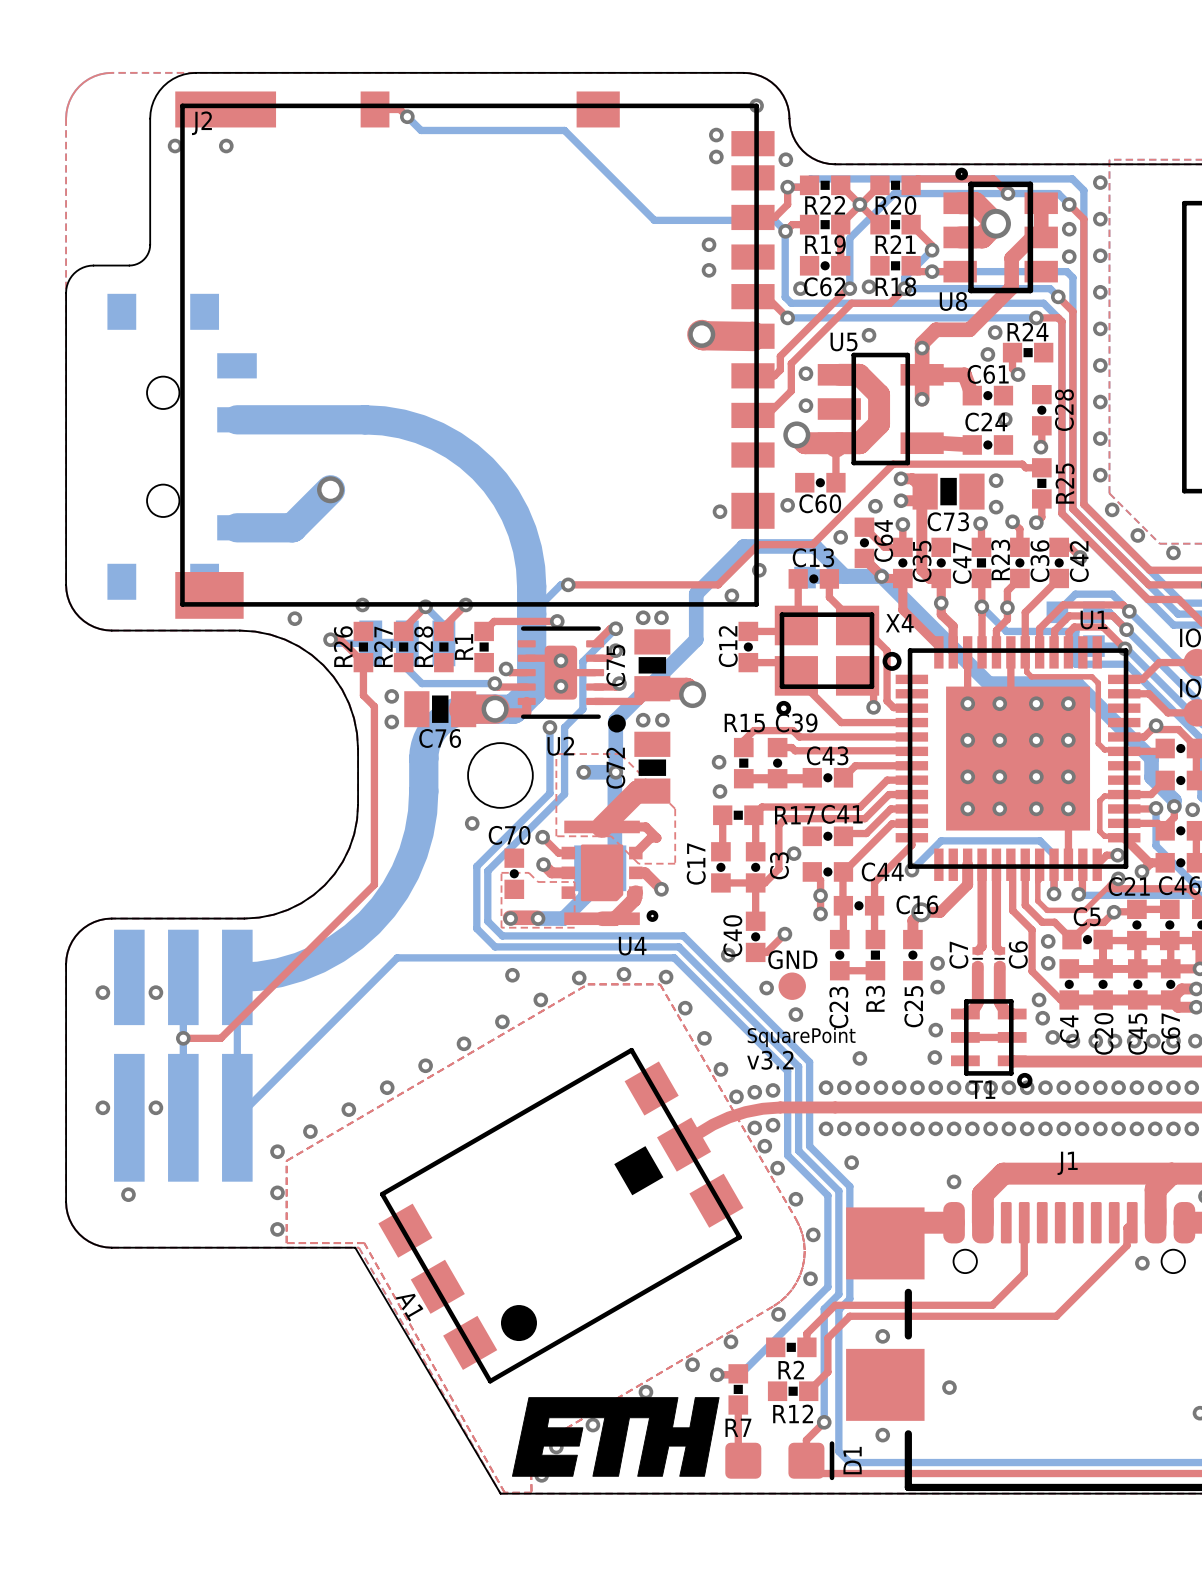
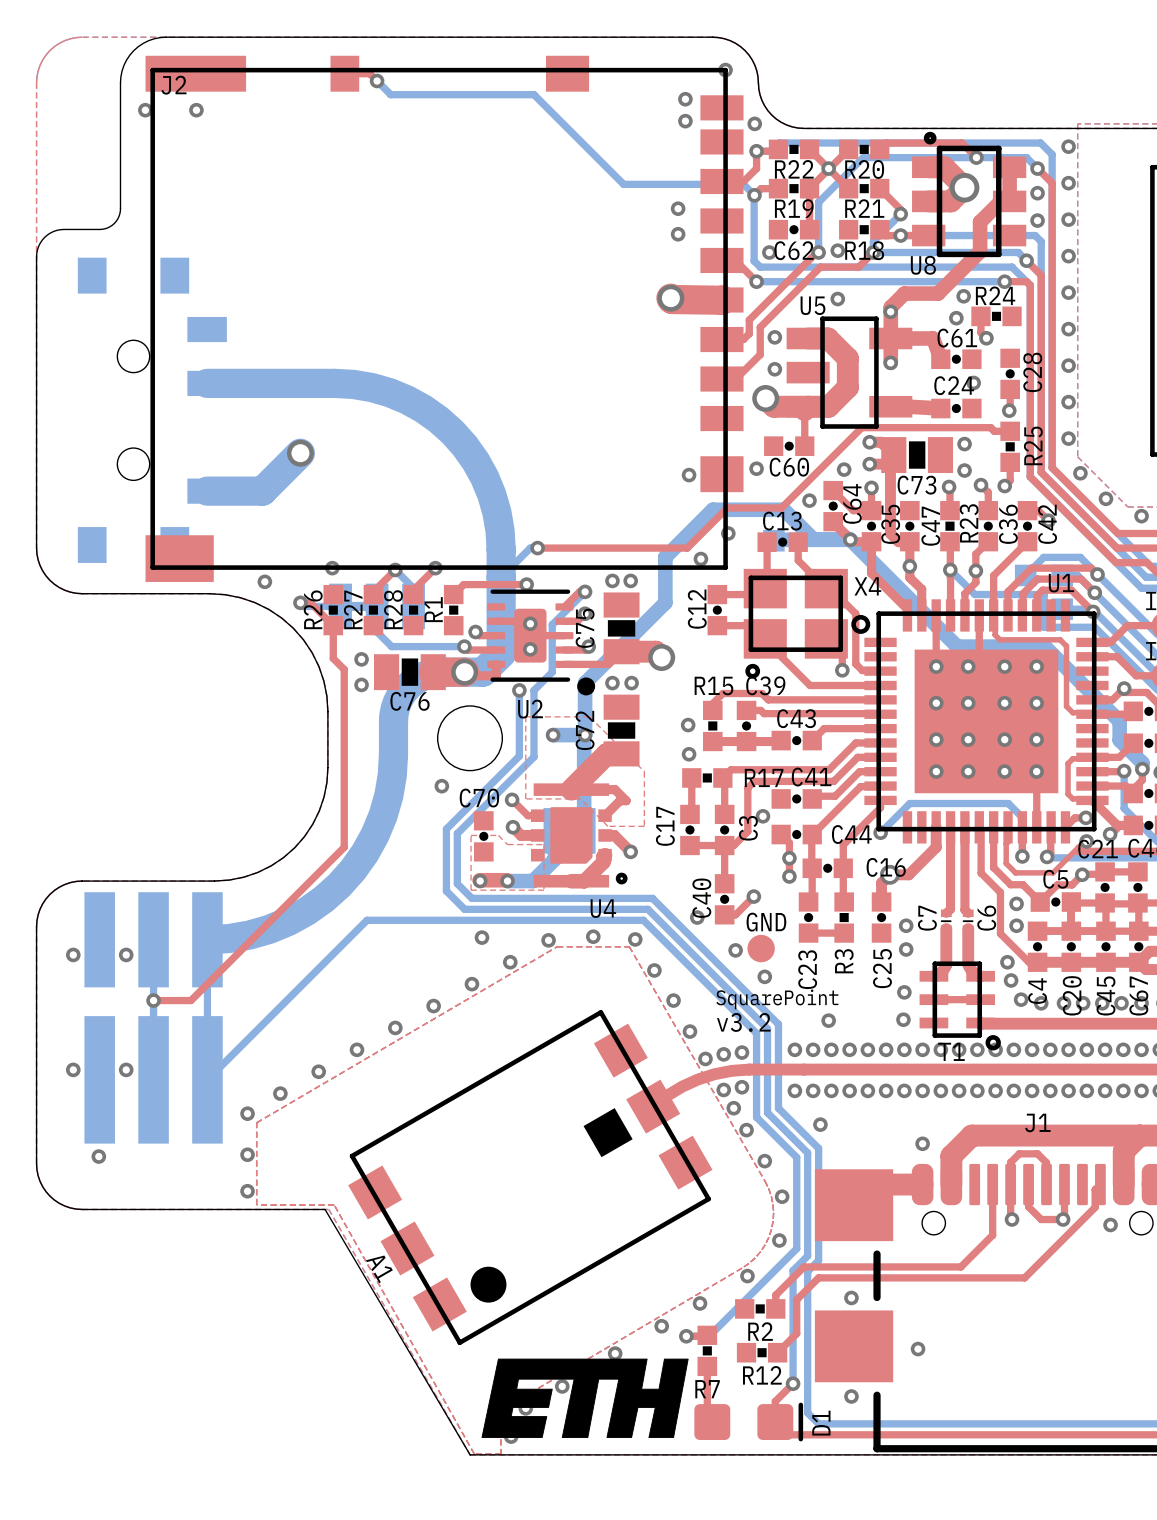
top track: none -> (1028, 1184) (1028, 1206) (1041, 1219) (1064, 1218) (1064, 1184)
top track: none -> (1046, 1184) (1046, 1162) (1037, 1153) (1019, 1153) (1010, 1162) (1012, 1219)
via: none -> (1012, 1219)
via: none -> (1063, 1219)

